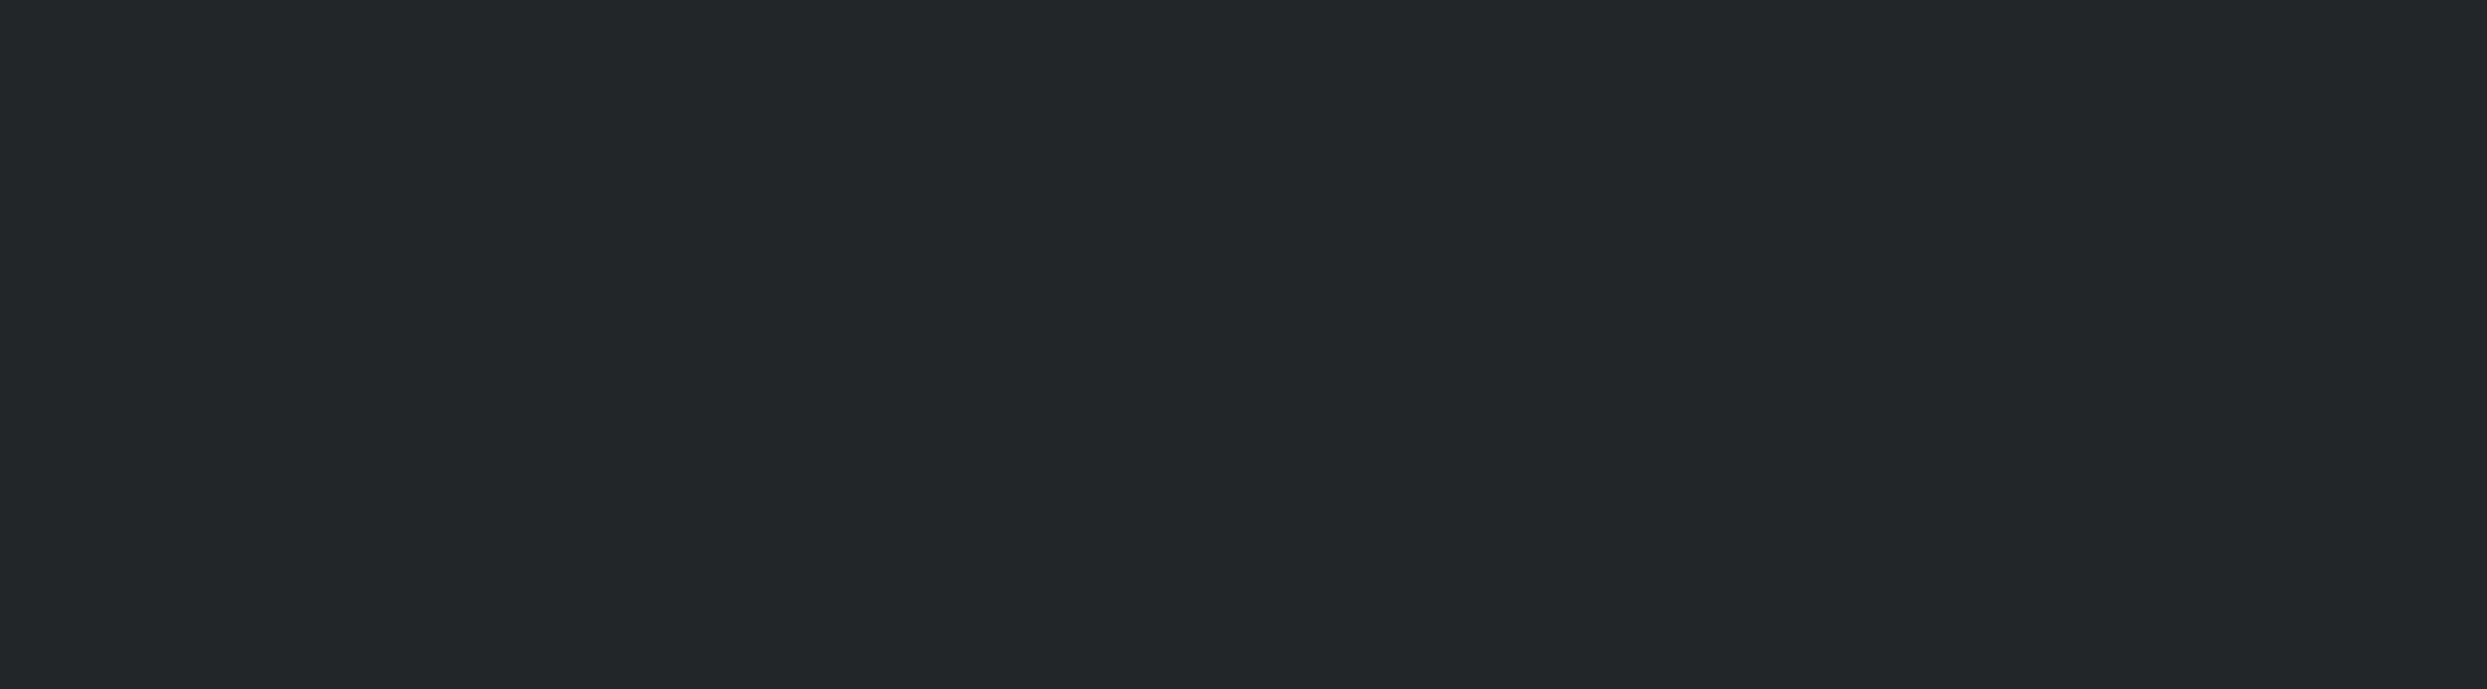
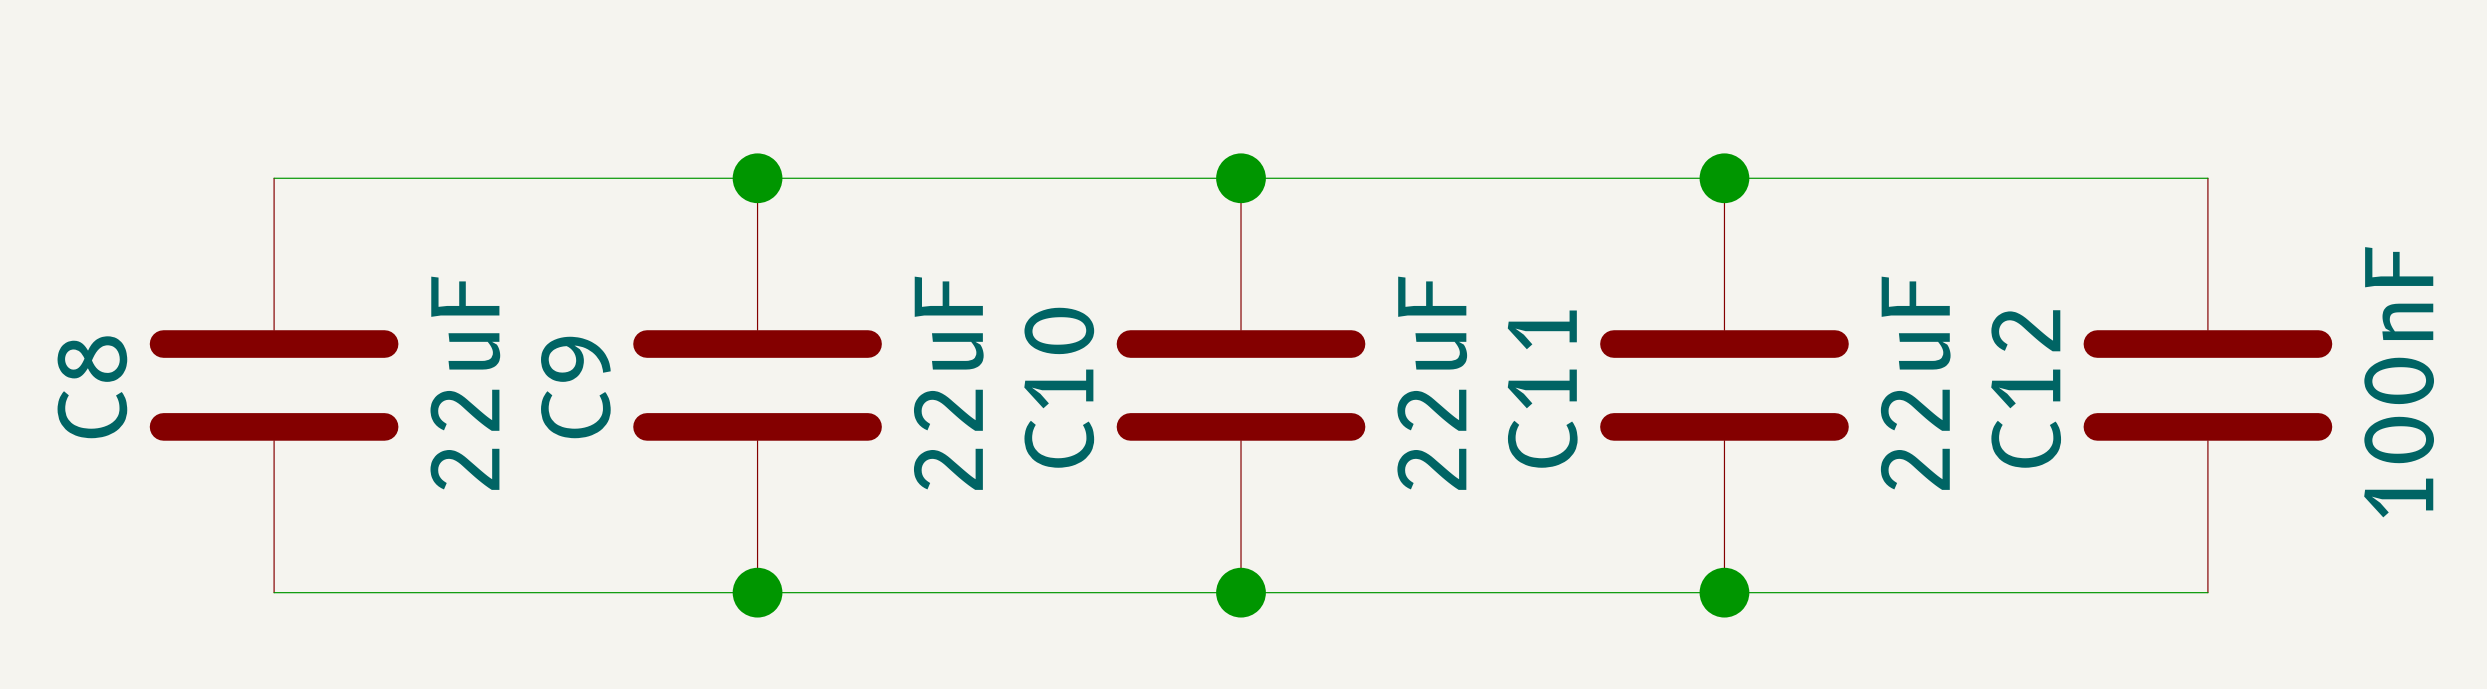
wire: none -> (274, 178) (2207, 178)
junction: none -> (757, 178)
junction: none -> (1241, 178)
junction: none -> (1724, 178)
C8: none -> 22uF (274, 385)
C9: none -> 22uF (757, 385)
C10: none -> 22uF (1241, 385)
C11: none -> 22uF (1724, 385)
C12: none -> 100nF (2207, 385)
wire: none -> (274, 592) (2207, 592)
junction: none -> (757, 592)
junction: none -> (1241, 592)
junction: none -> (1724, 592)

